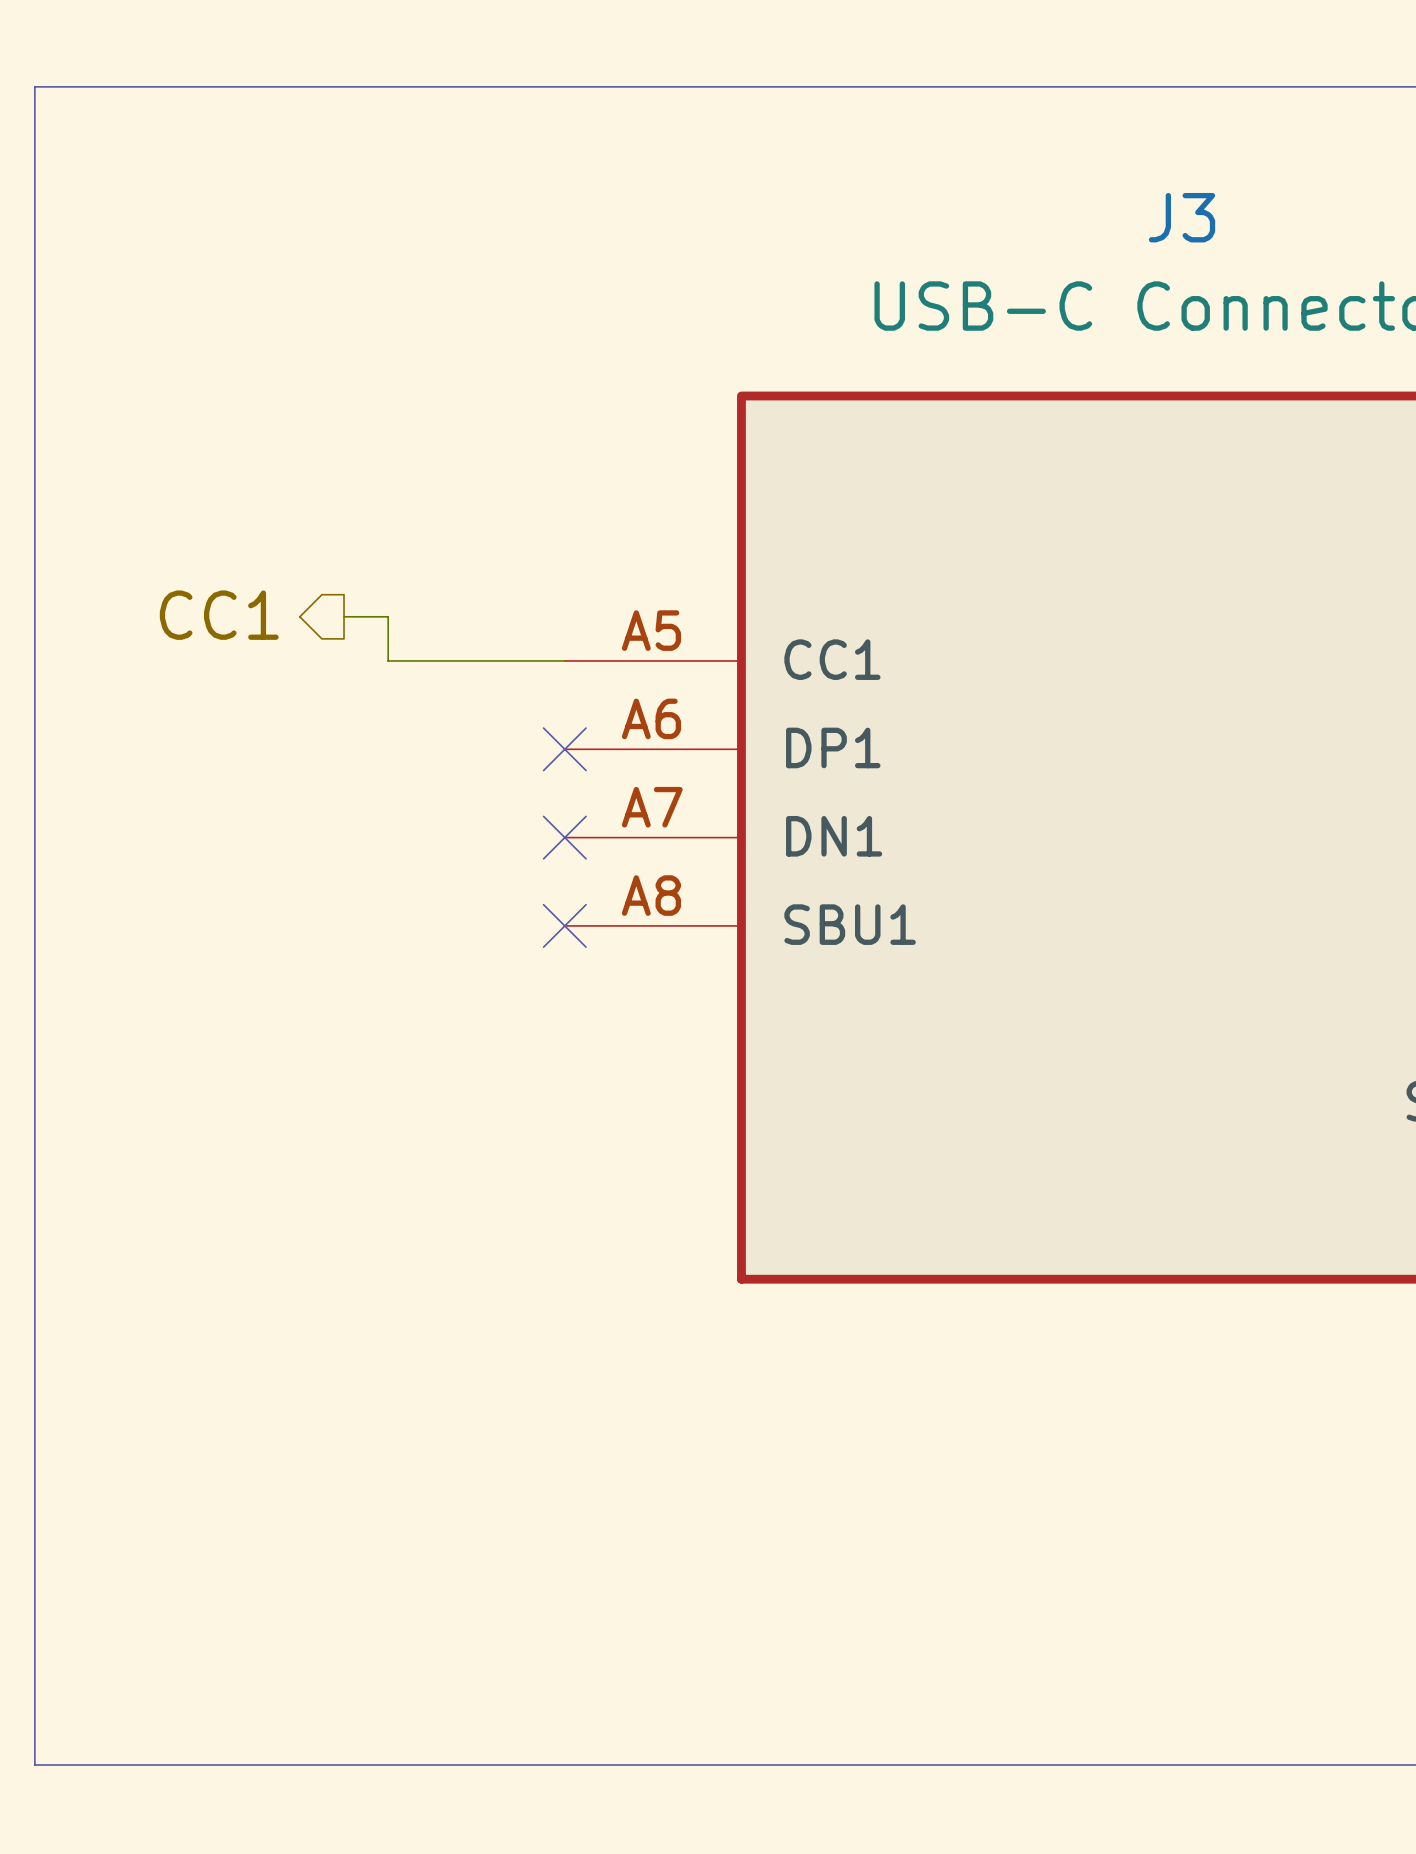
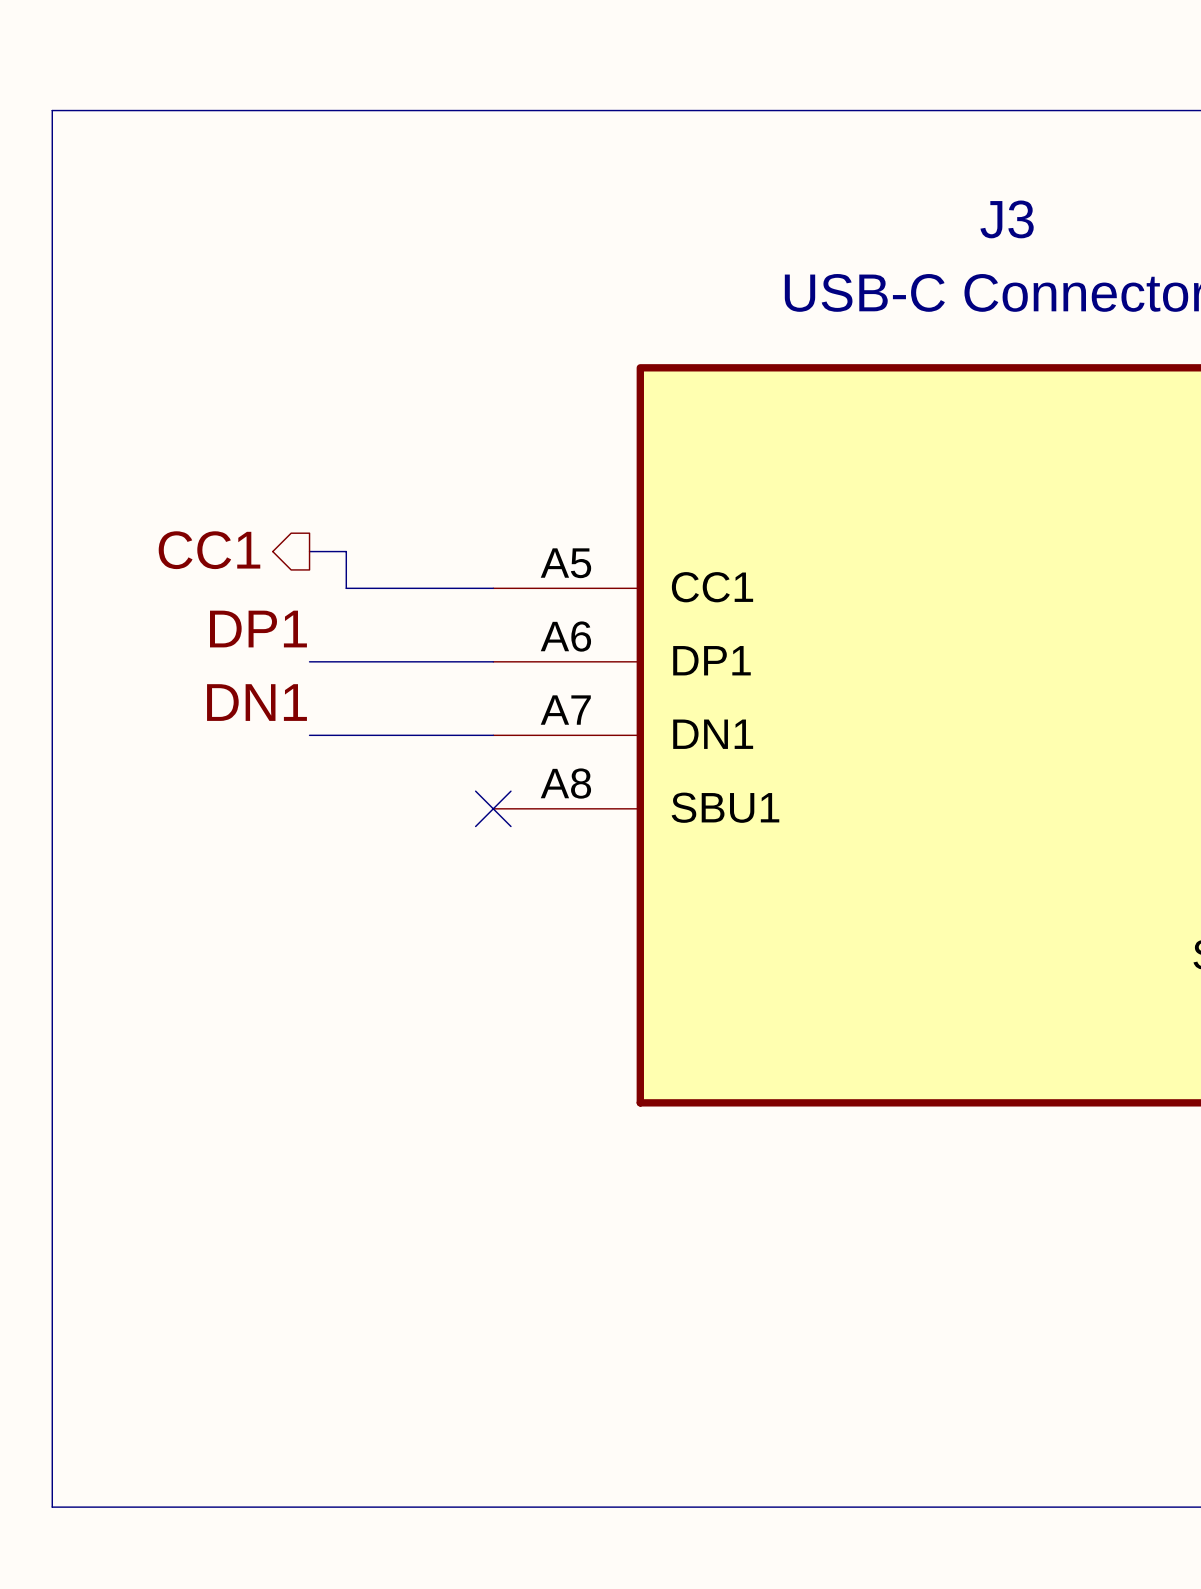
label: none -> DP1 (258, 629)
wire: none -> (309, 661) (493, 661)
no-connect mark: (564, 749) -> none
label: none -> DN1 (256, 702)
wire: none -> (309, 735) (493, 735)
no-connect mark: (564, 837) -> none

